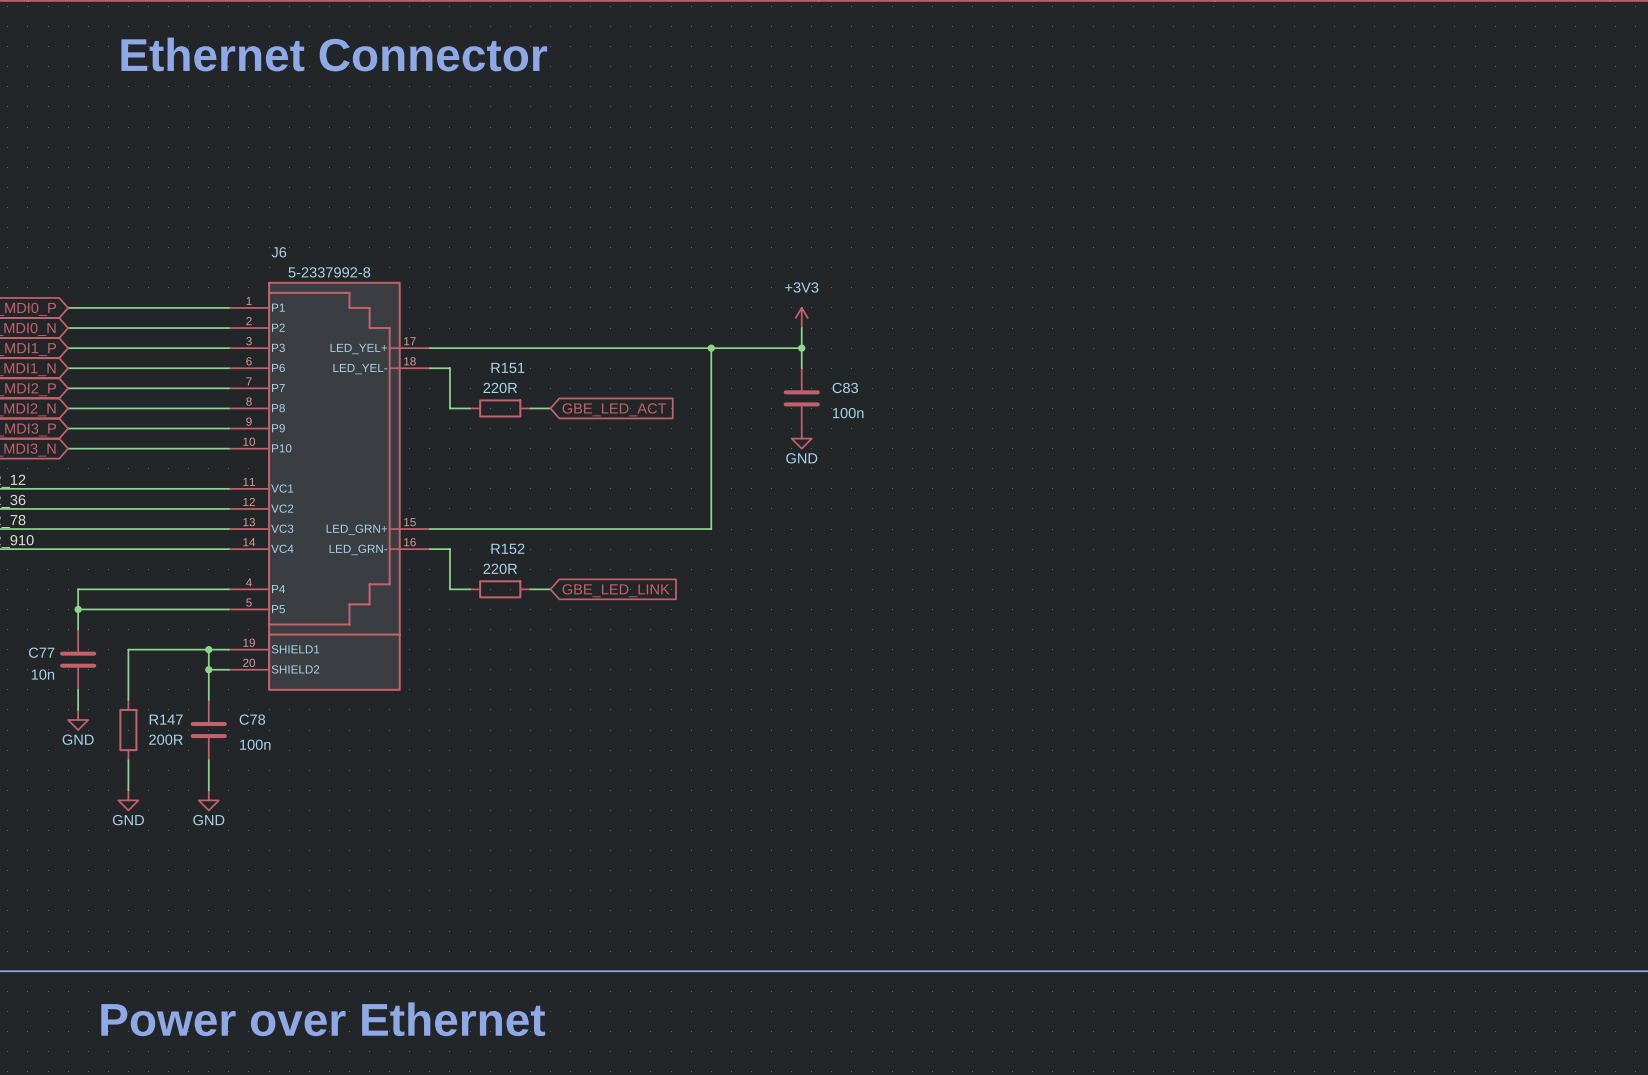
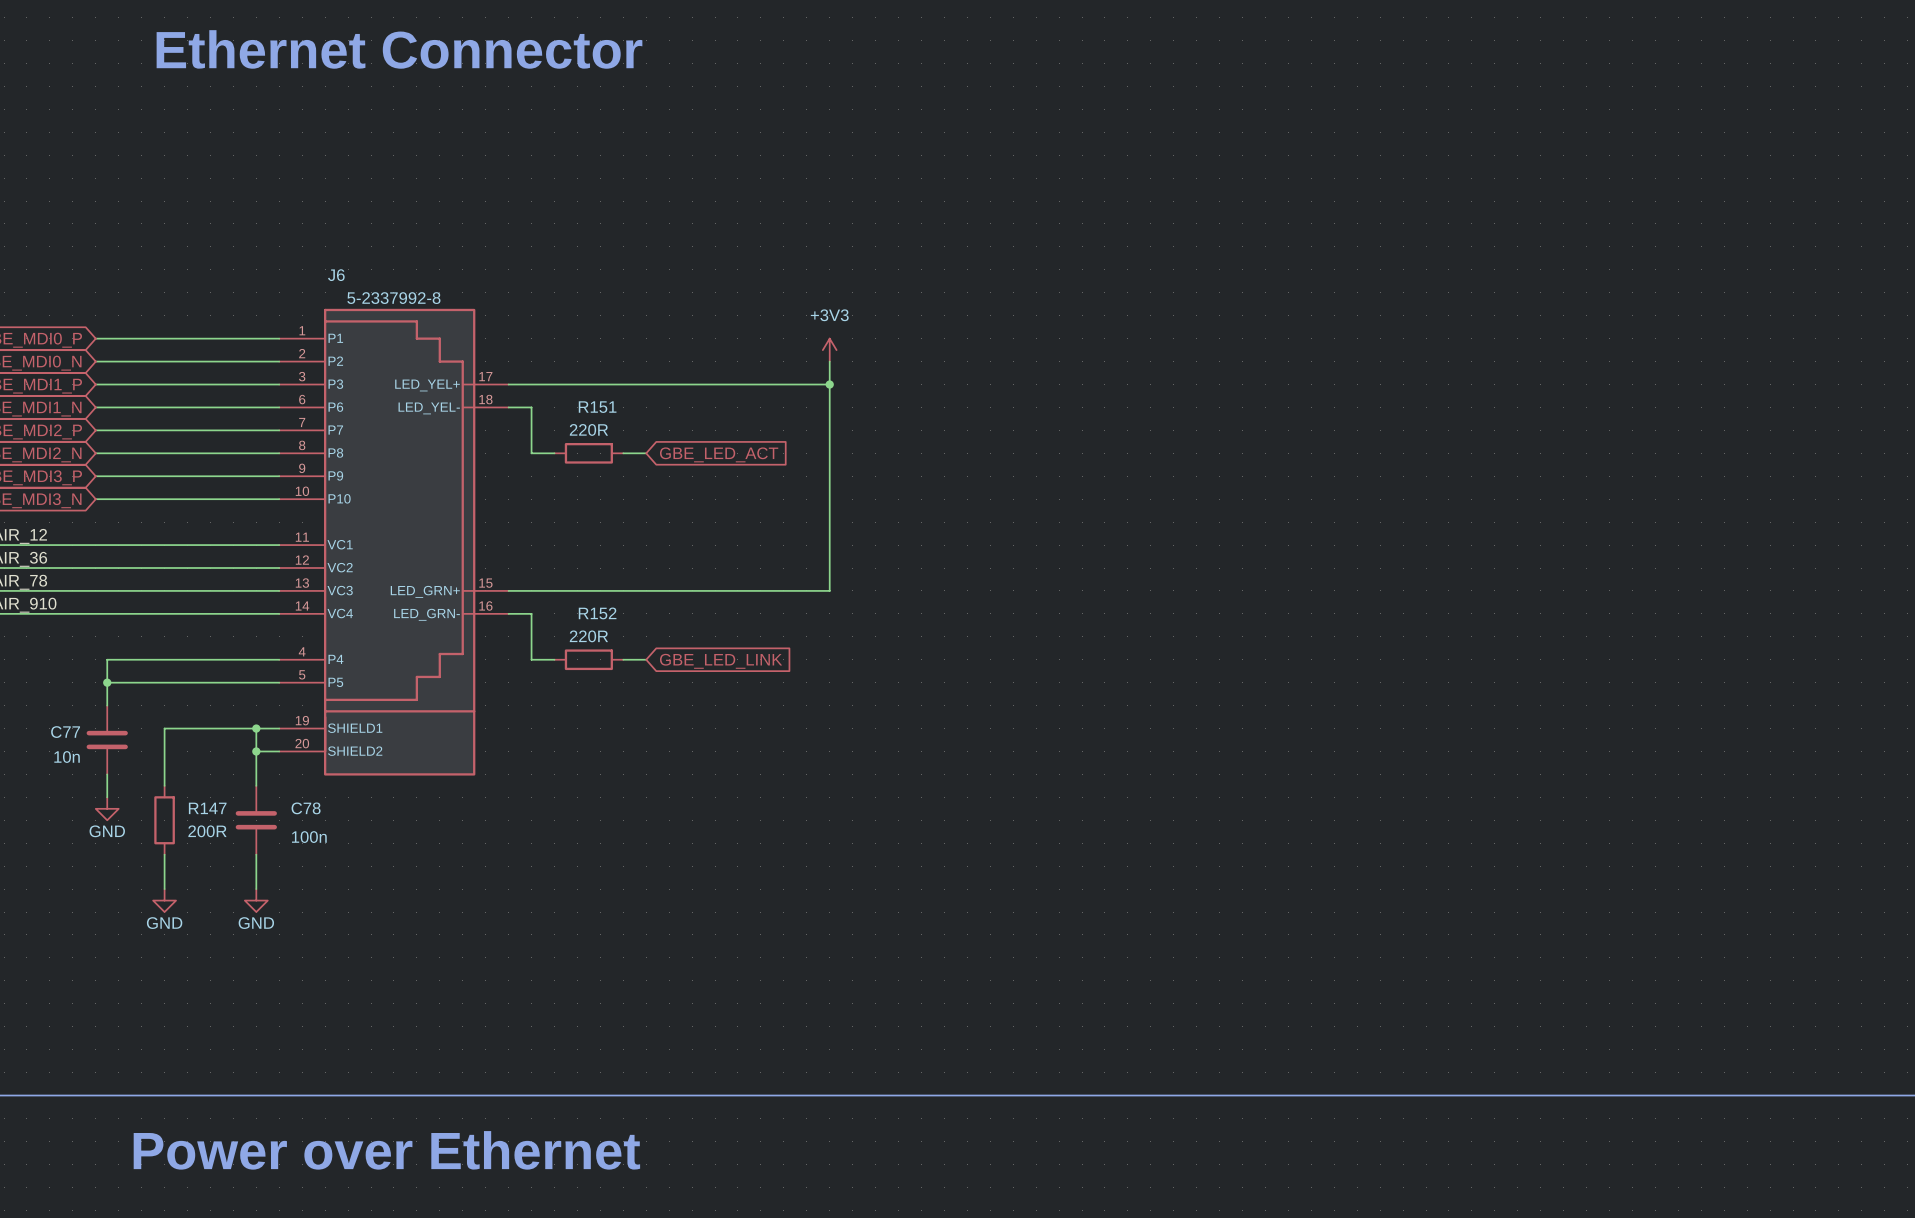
power symbol position: +3V3 (801, 317) -> +3V3 (829, 350)
wire: (801, 328) (801, 368) -> none
wire: (711, 348) (801, 348) -> (829, 384) (829, 361)
junction: (801, 348) -> none
C83: (801, 398) -> none
power symbol: GND (801, 438) -> none

